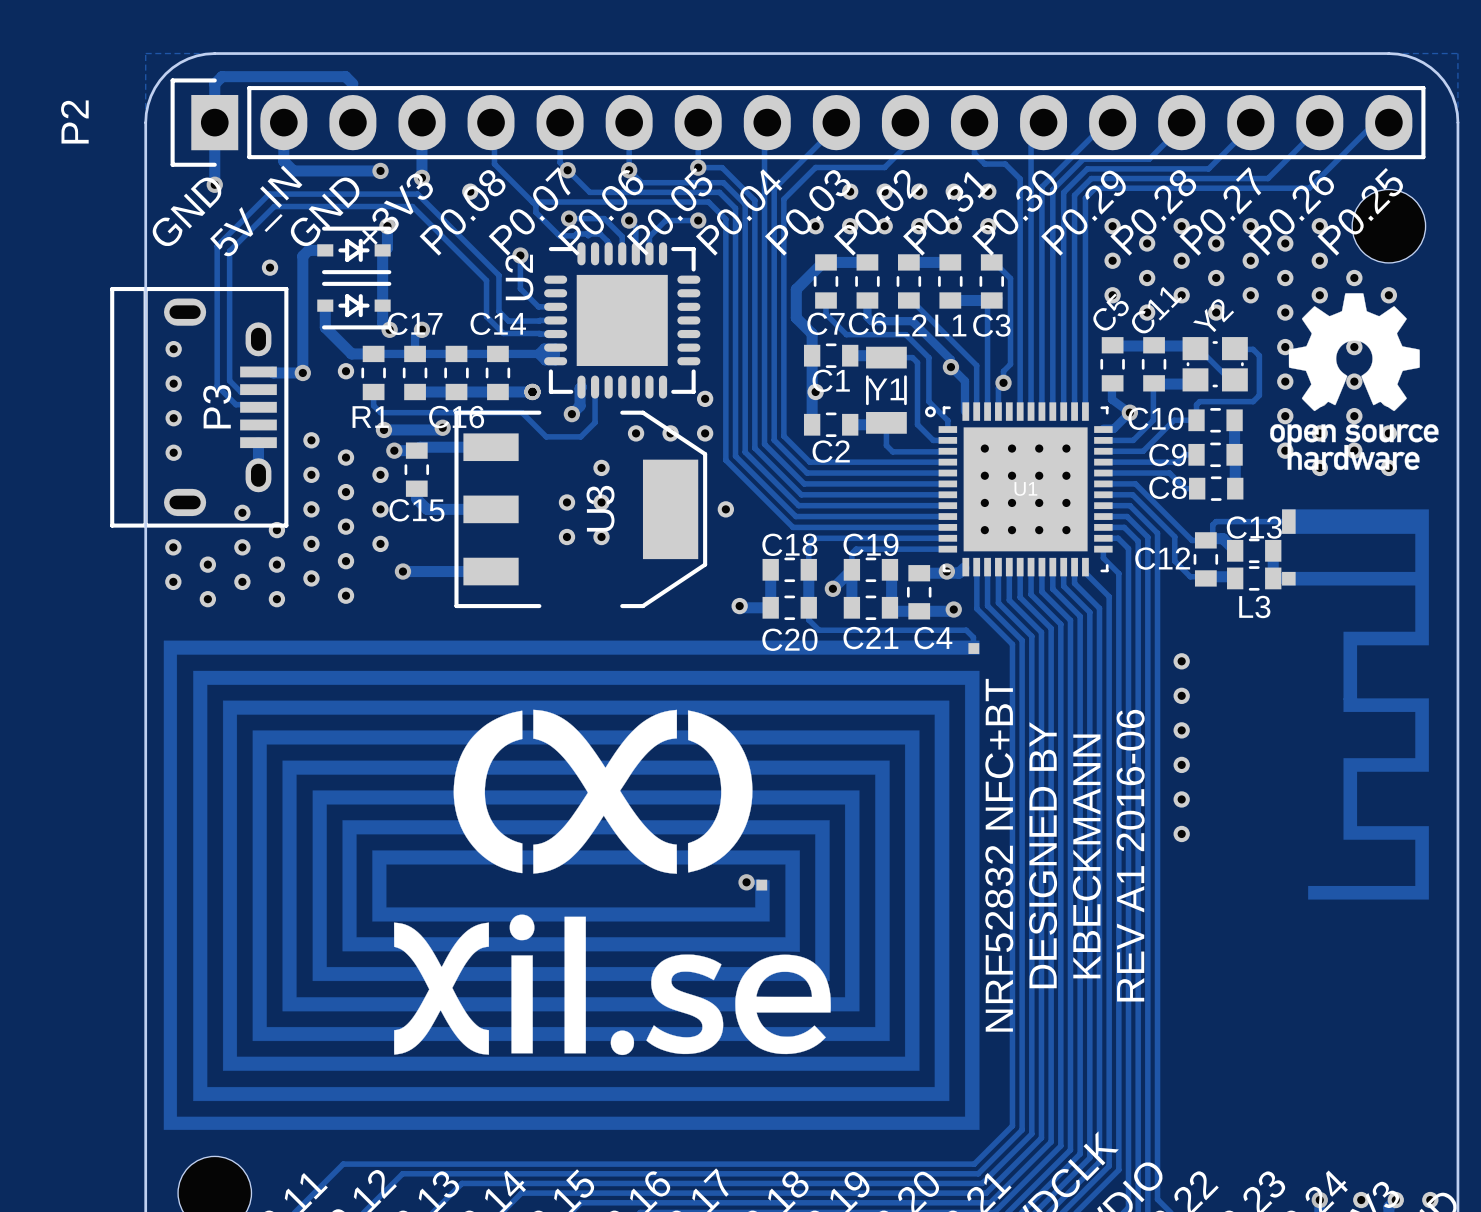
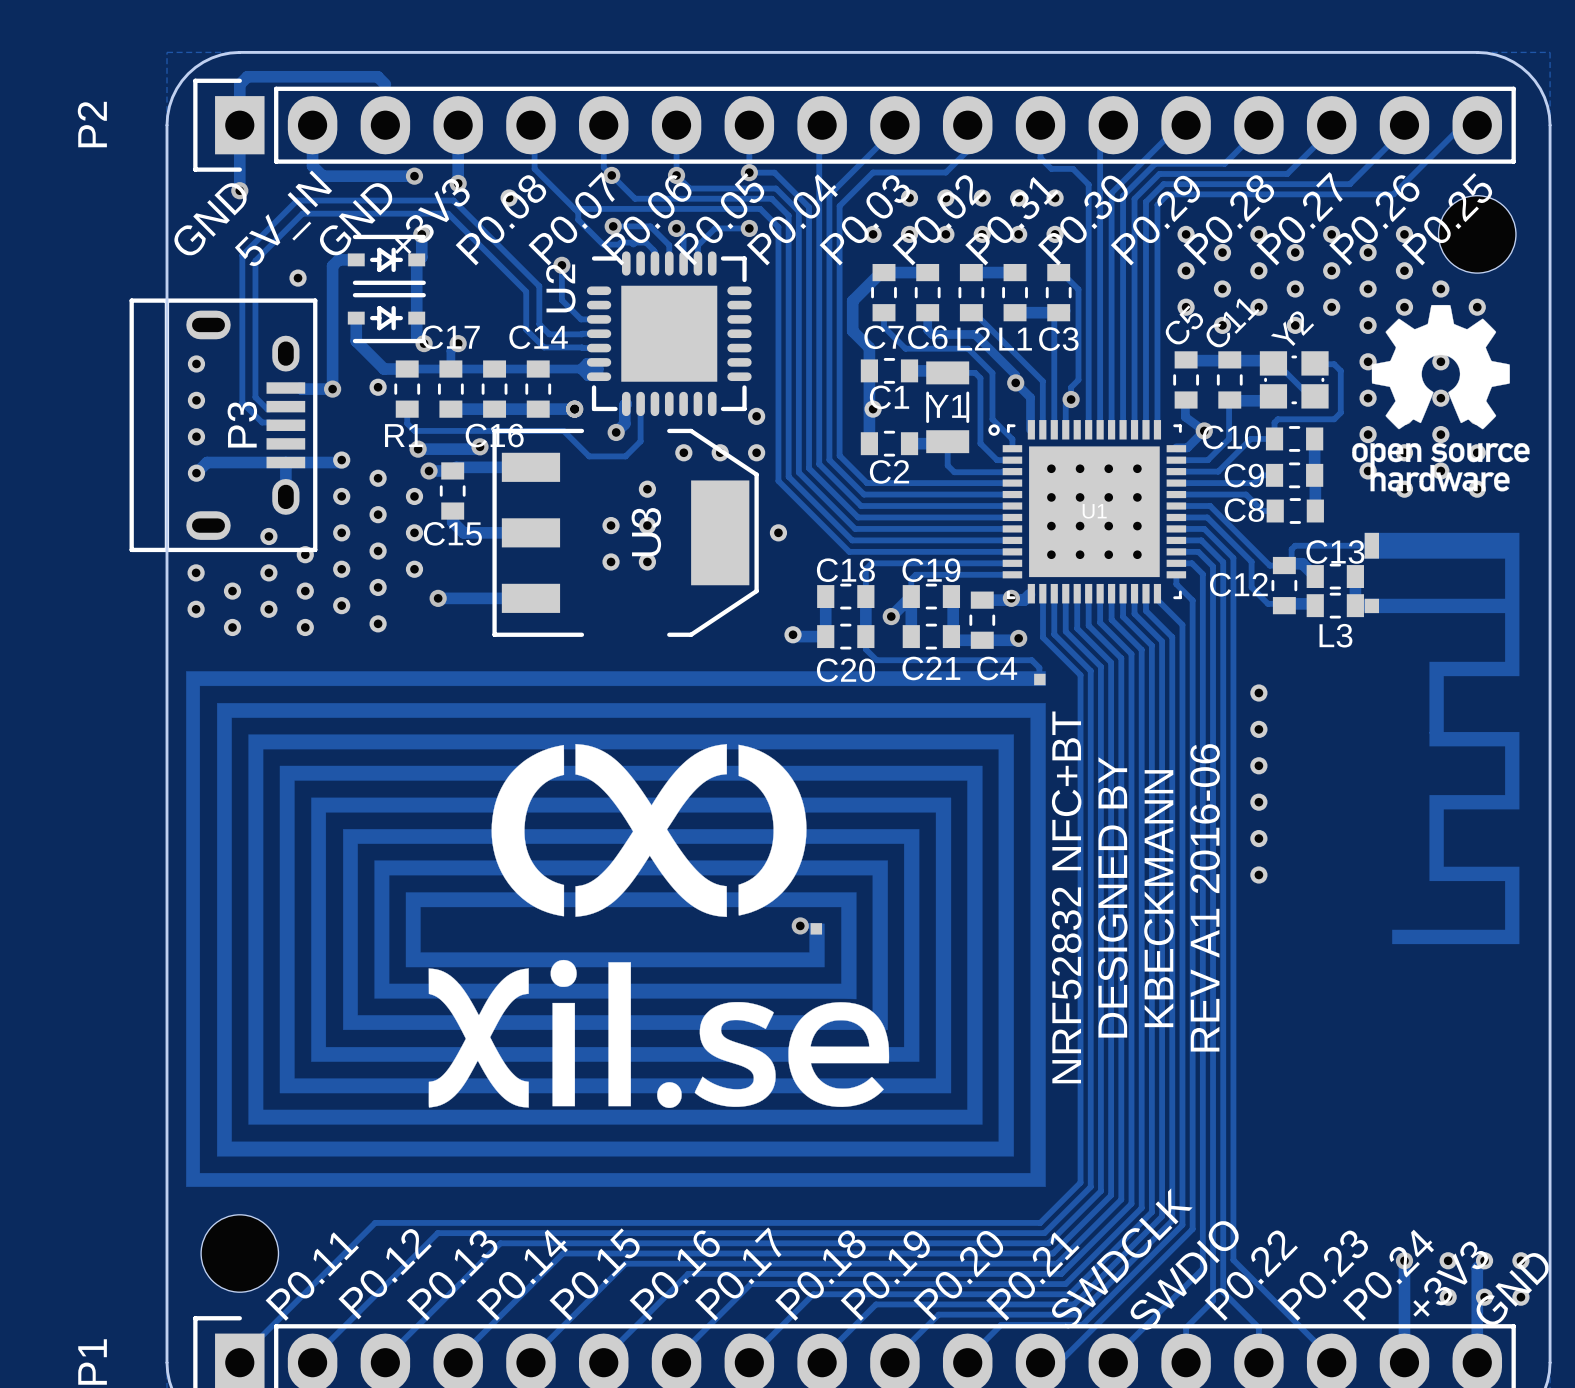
track: none -> (341, 460) (339, 462) (207, 462) (196, 473)

